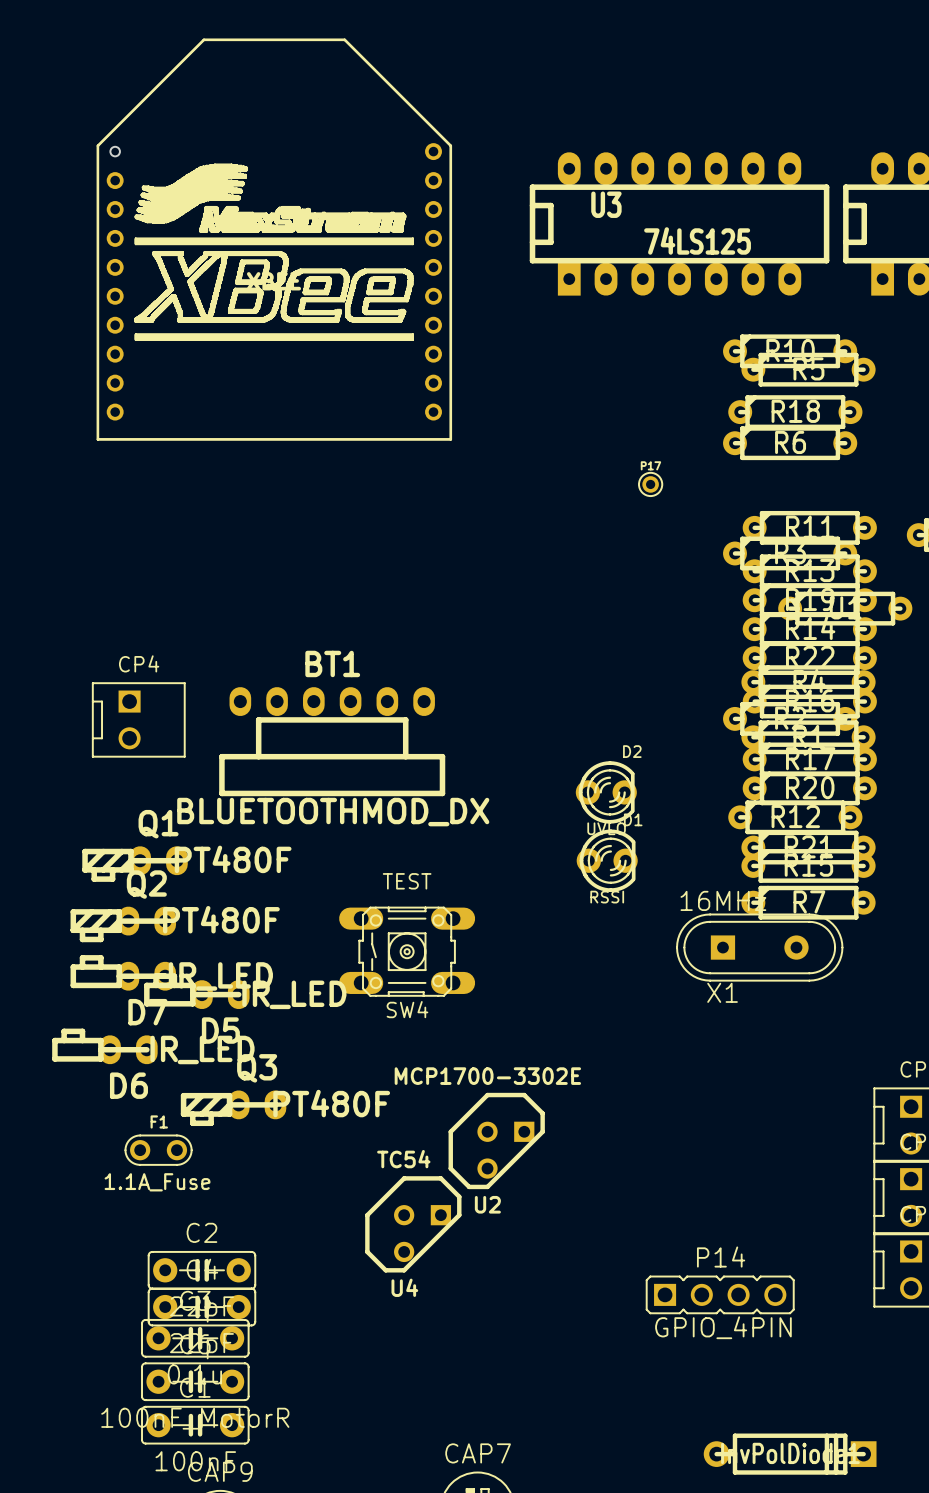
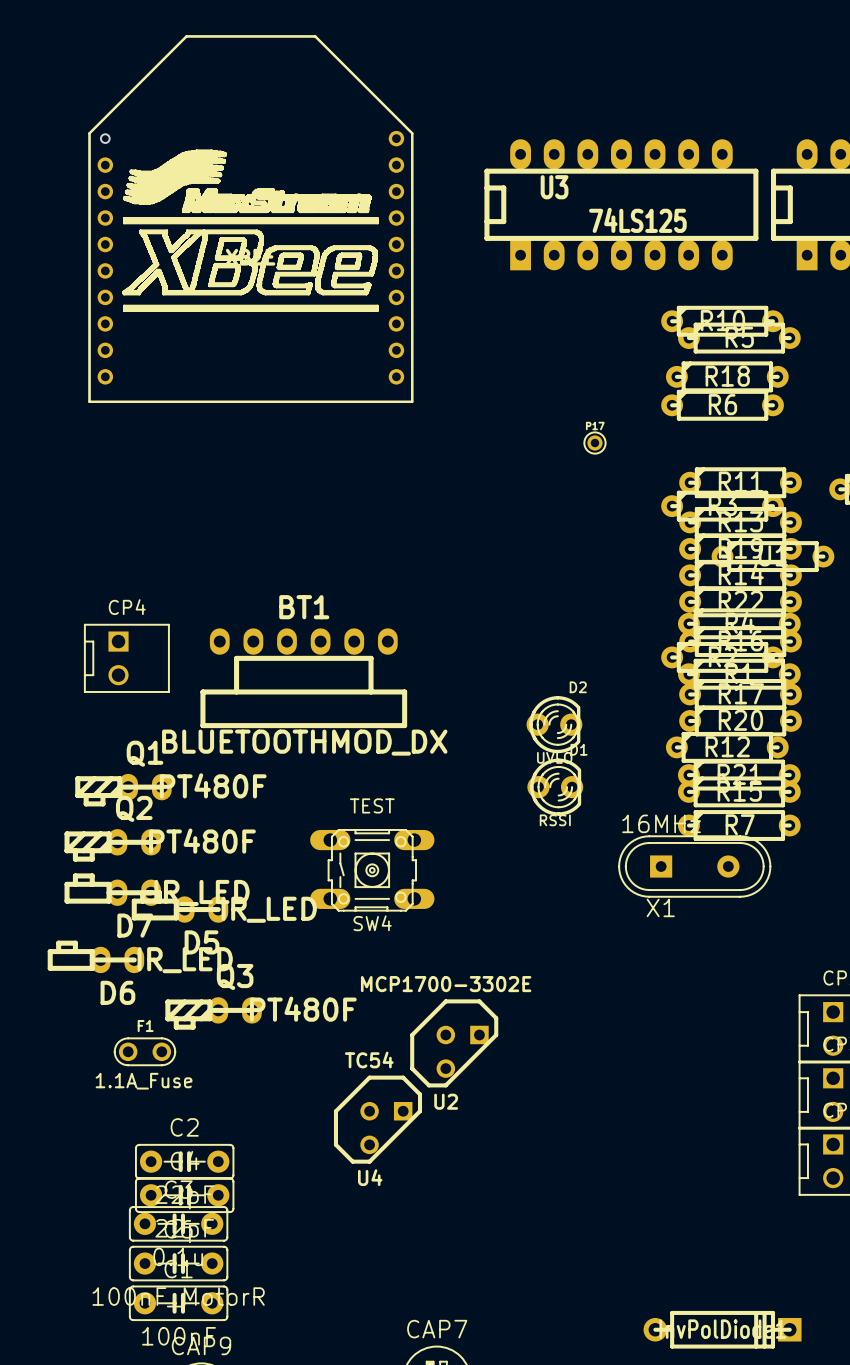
P14: GPIO_4PIN (720, 1294) -> none

